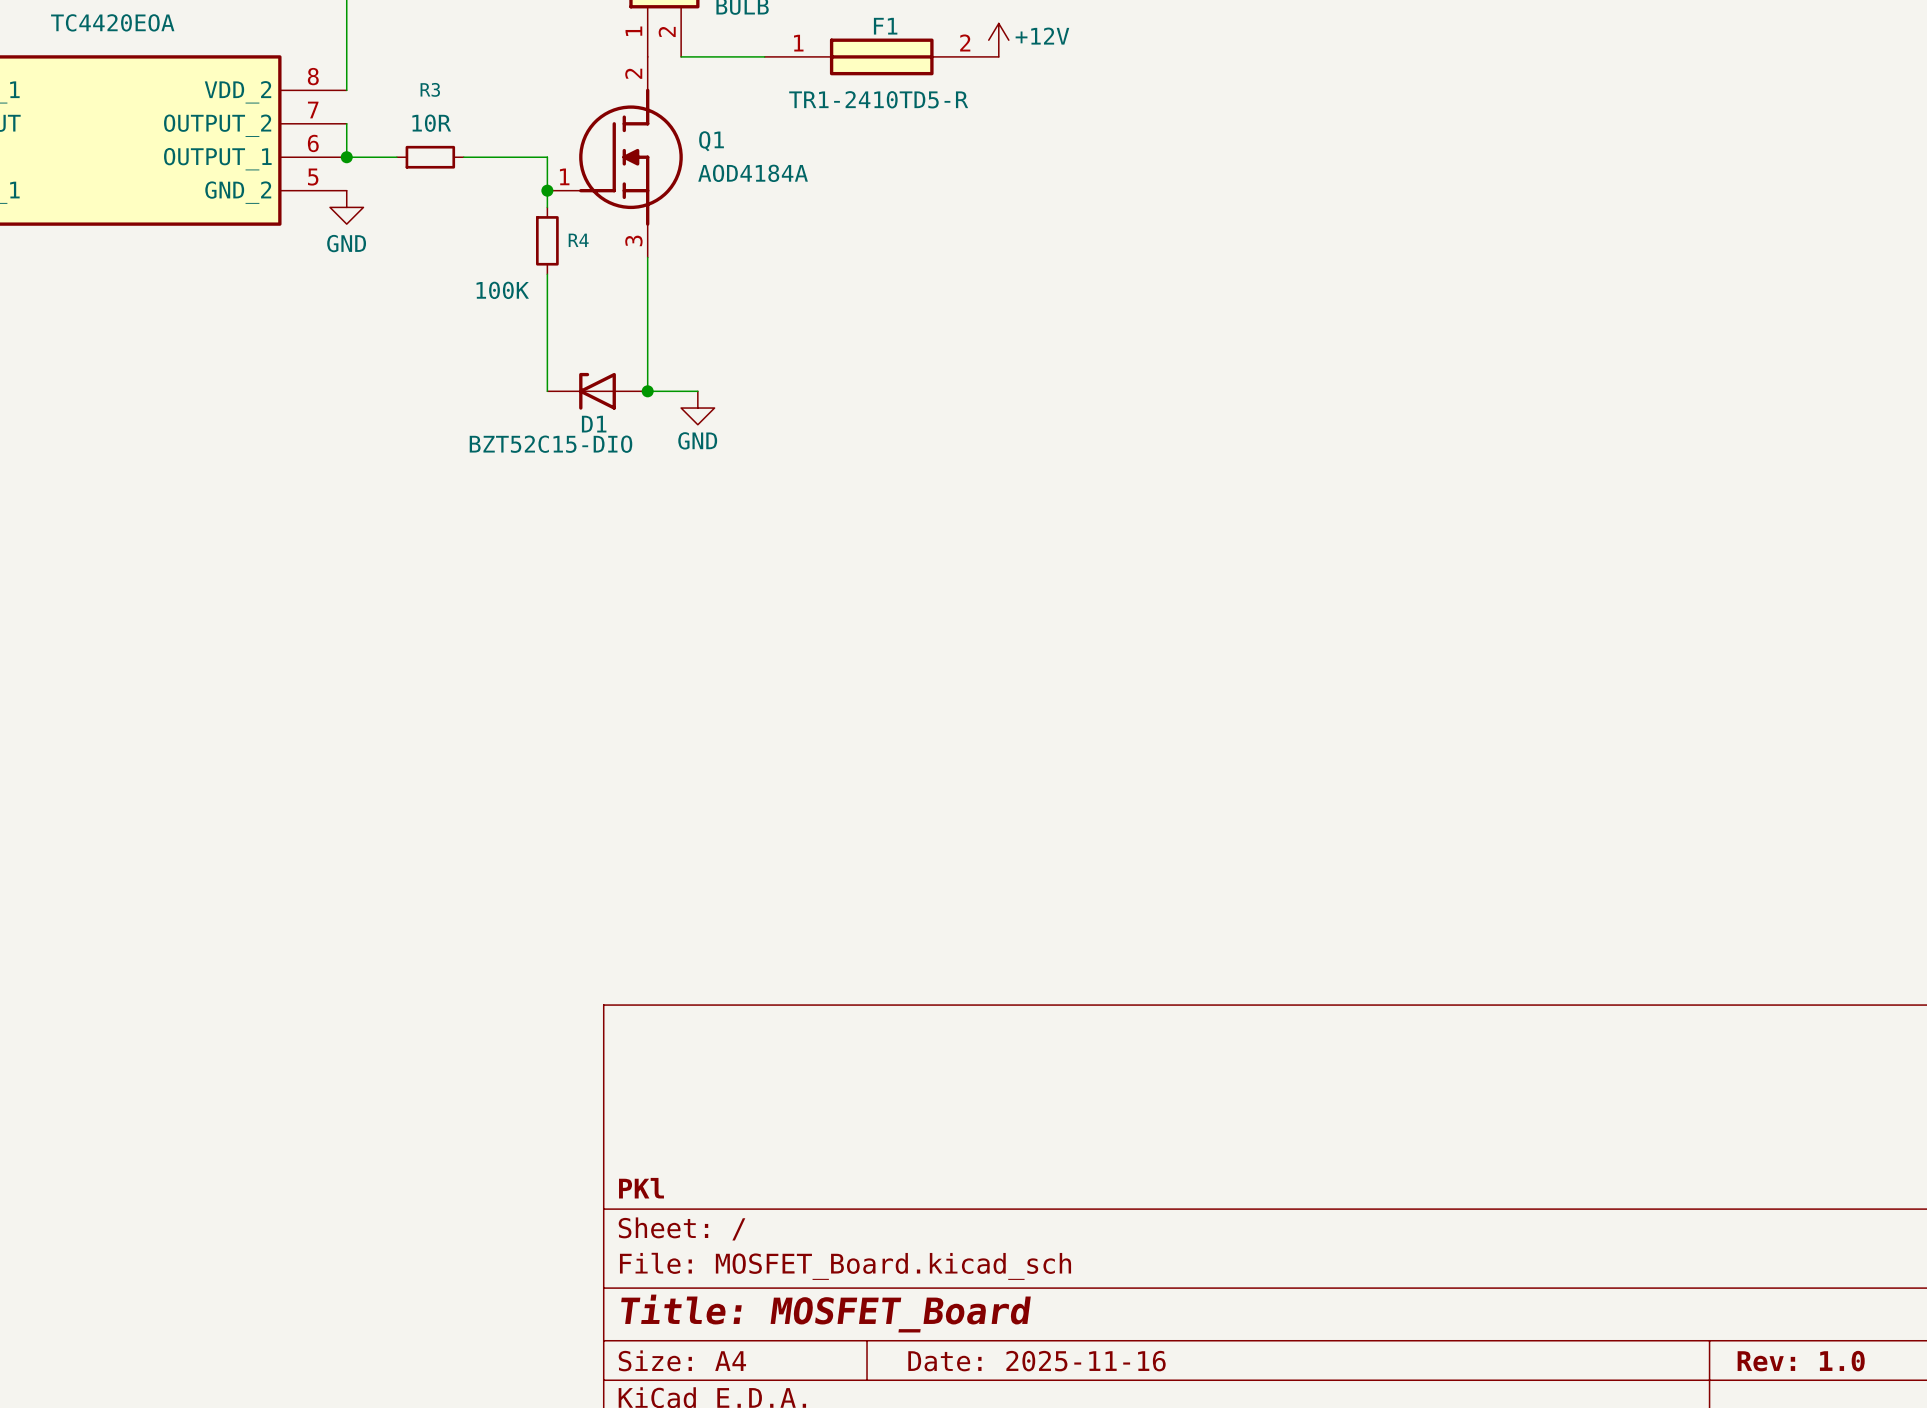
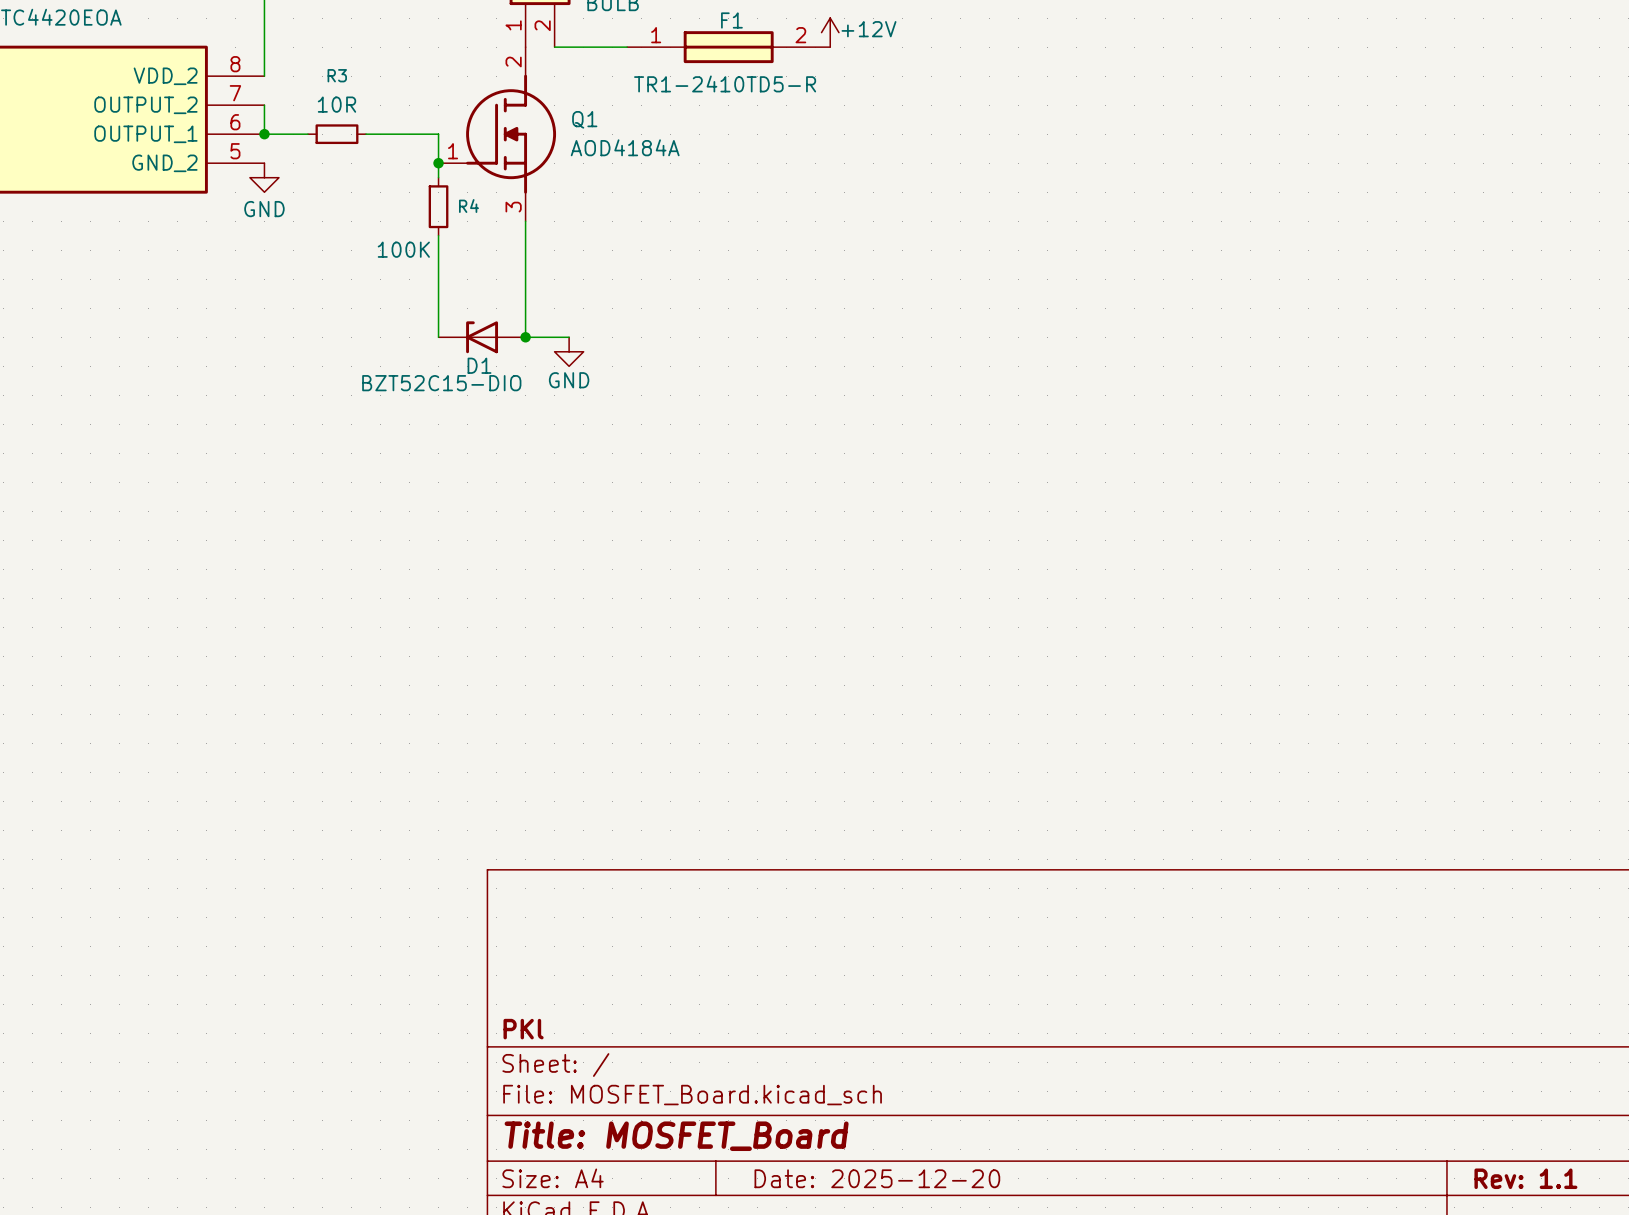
title block: Date: 2025-11-16 (1036, 1361) -> Date: 2025-12-20 (877, 1178)
title block: Rev: 1.0 (1801, 1361) -> Rev: 1.1 (1525, 1178)

